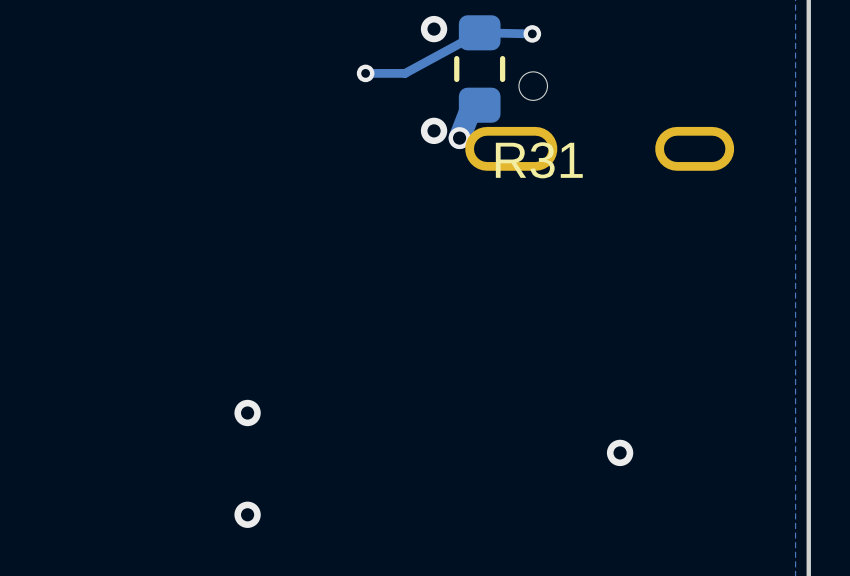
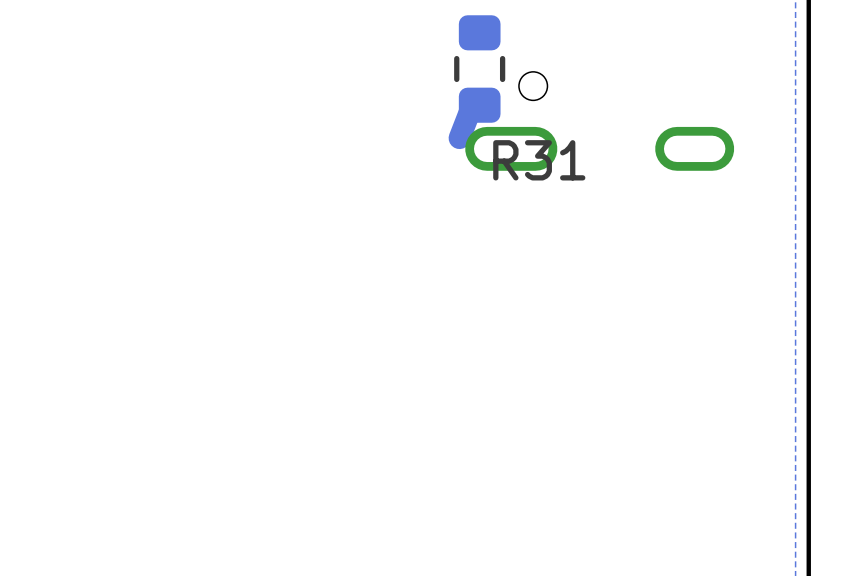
via: (434, 29) -> none
track: (532, 33) (479, 32) (405, 73) (365, 73) -> none
via: (532, 33) -> none
via: (365, 73) -> none
via: (434, 130) -> none
via: (459, 138) -> none
via: (247, 412) -> none
via: (620, 452) -> none
via: (247, 514) -> none

